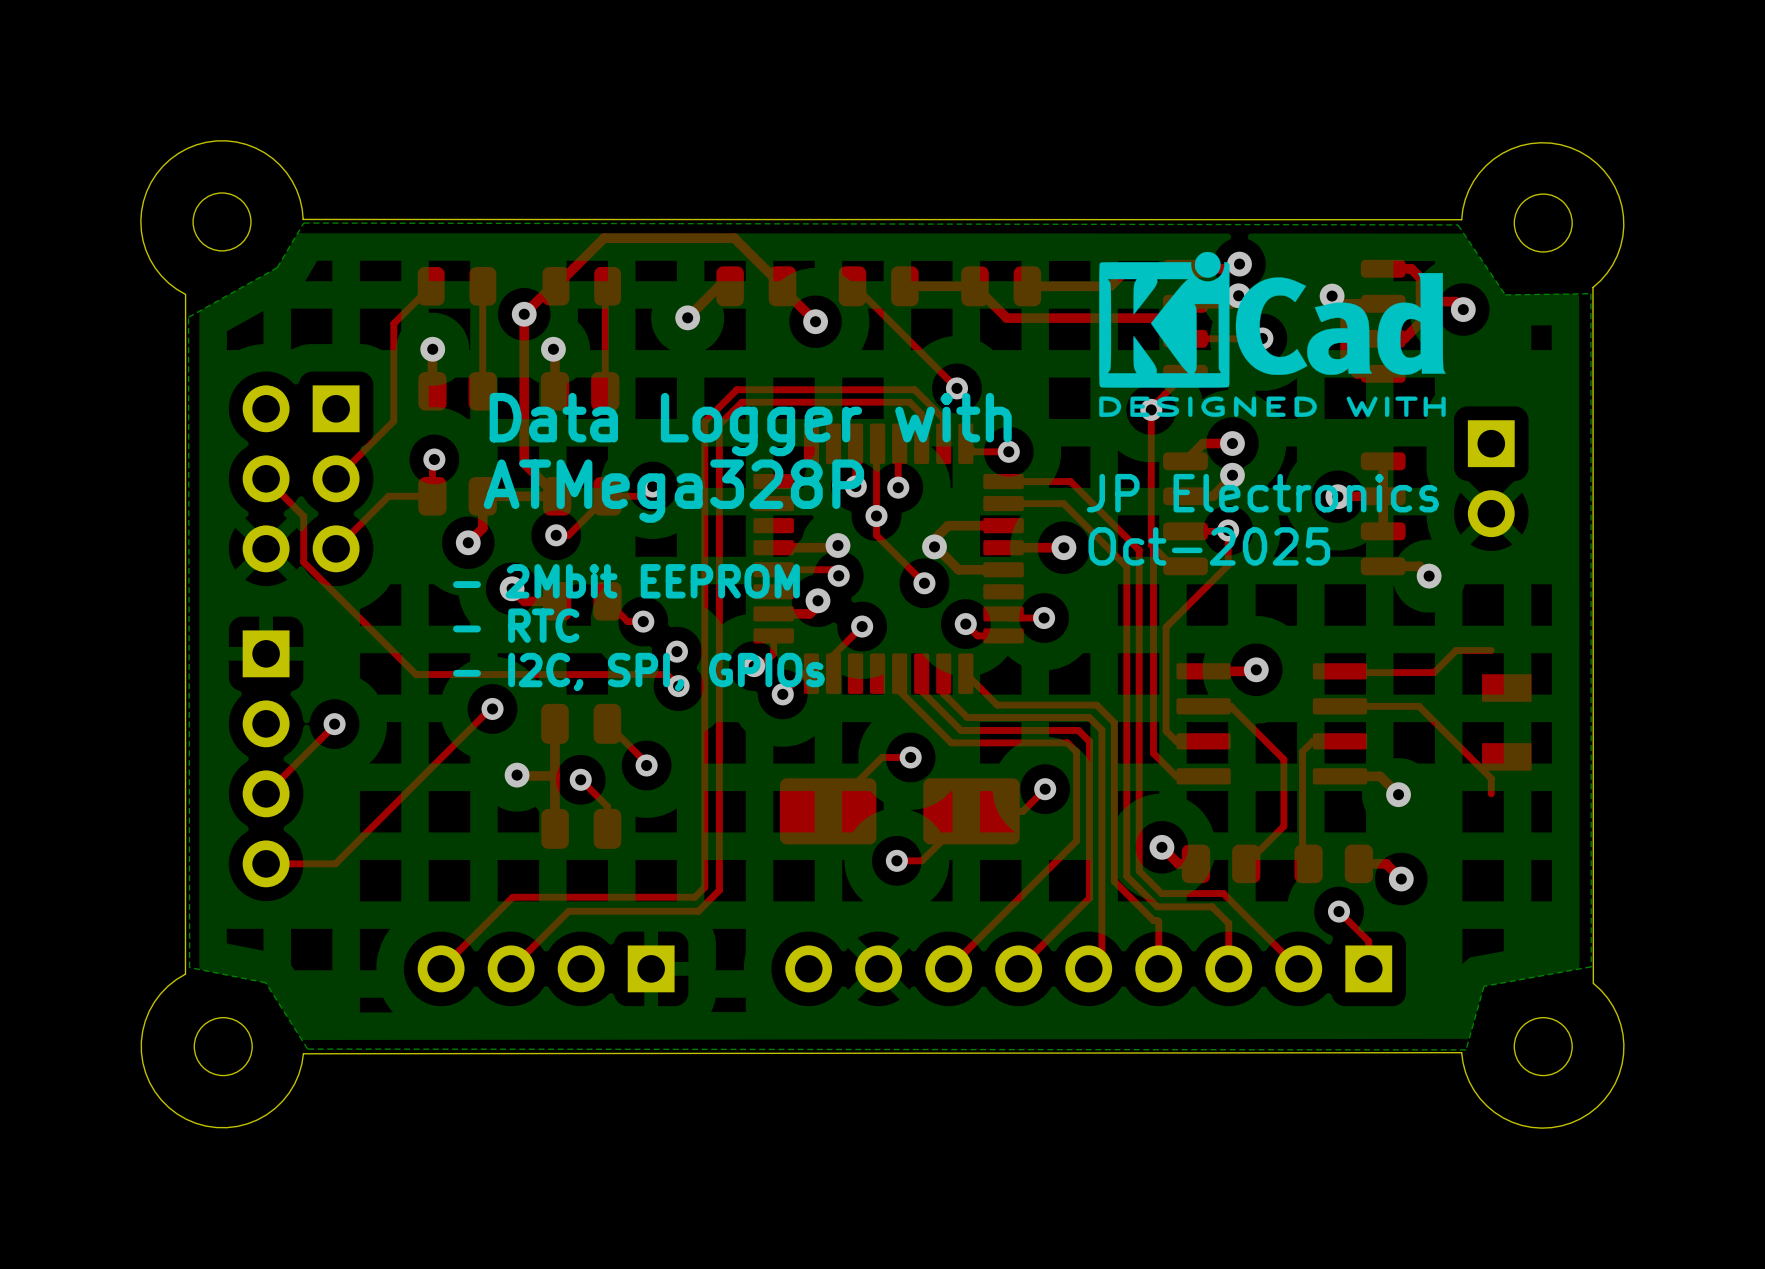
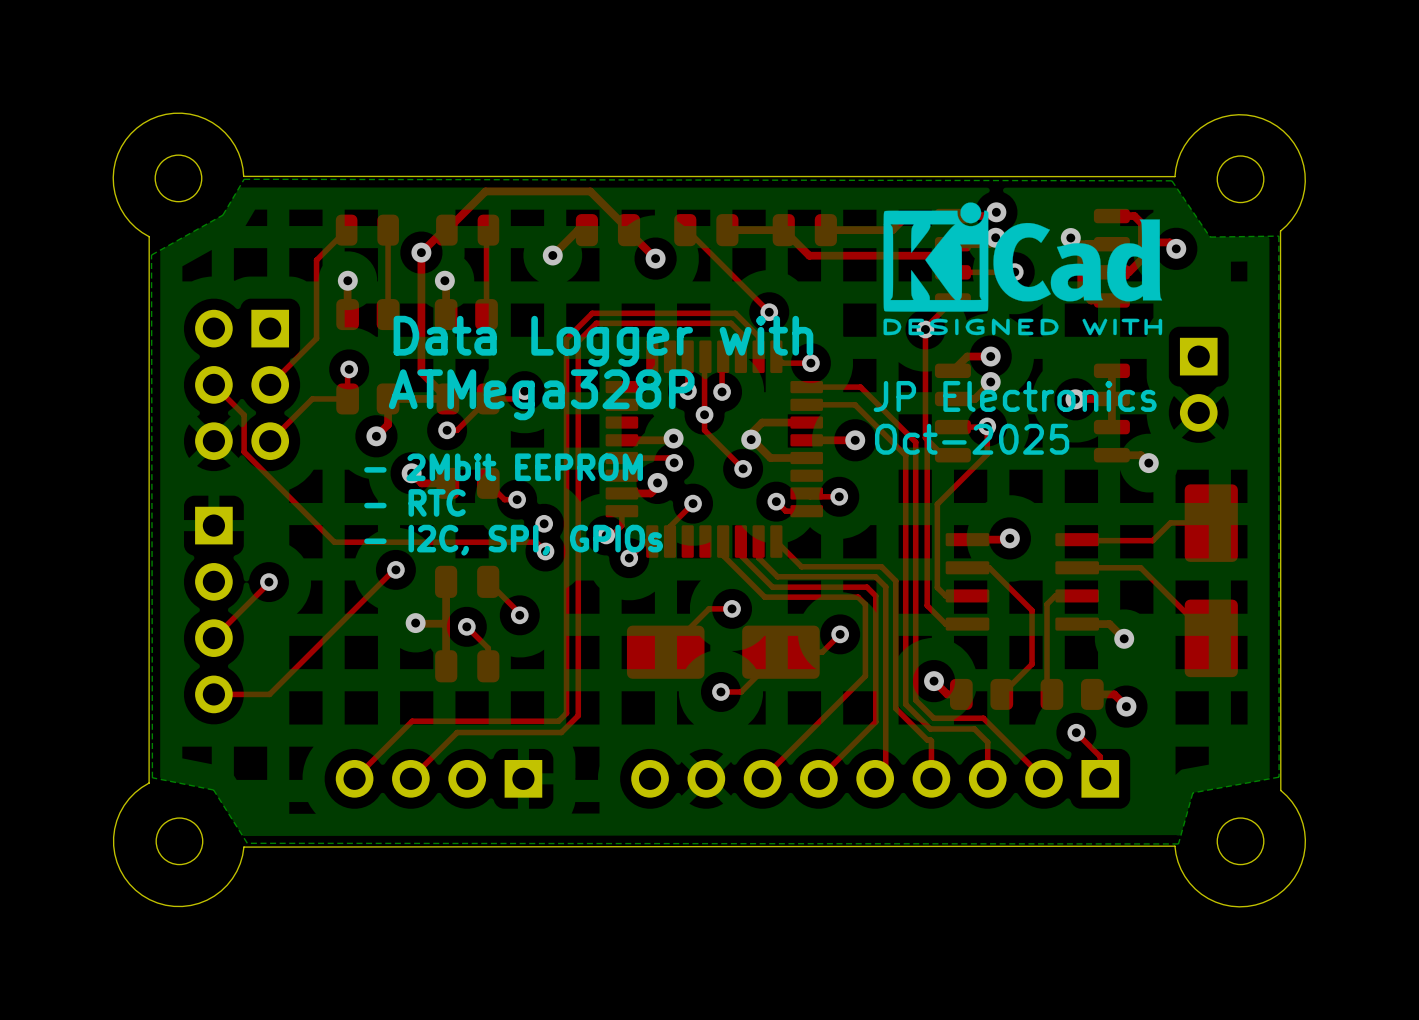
part footprint: [1482, 674, 1532, 771] -> [1184, 484, 1238, 678]

